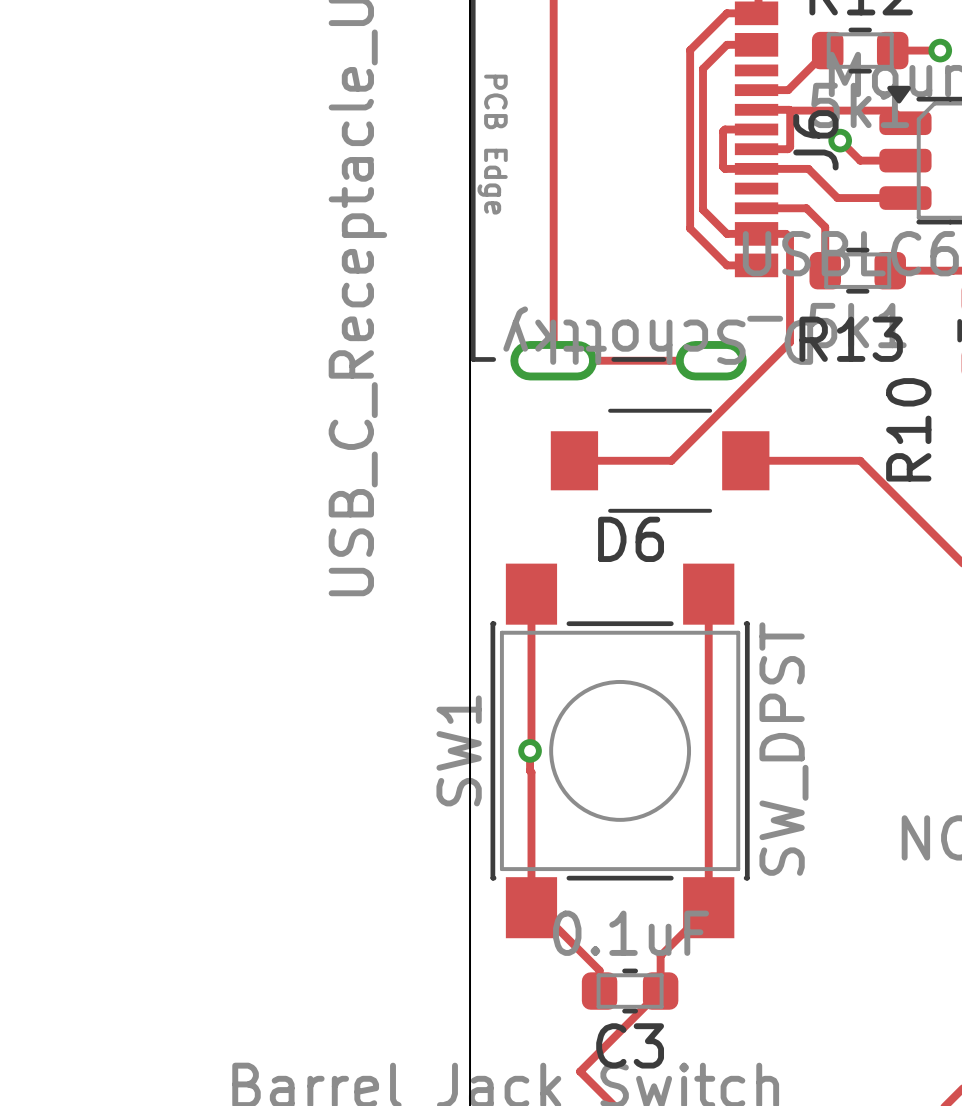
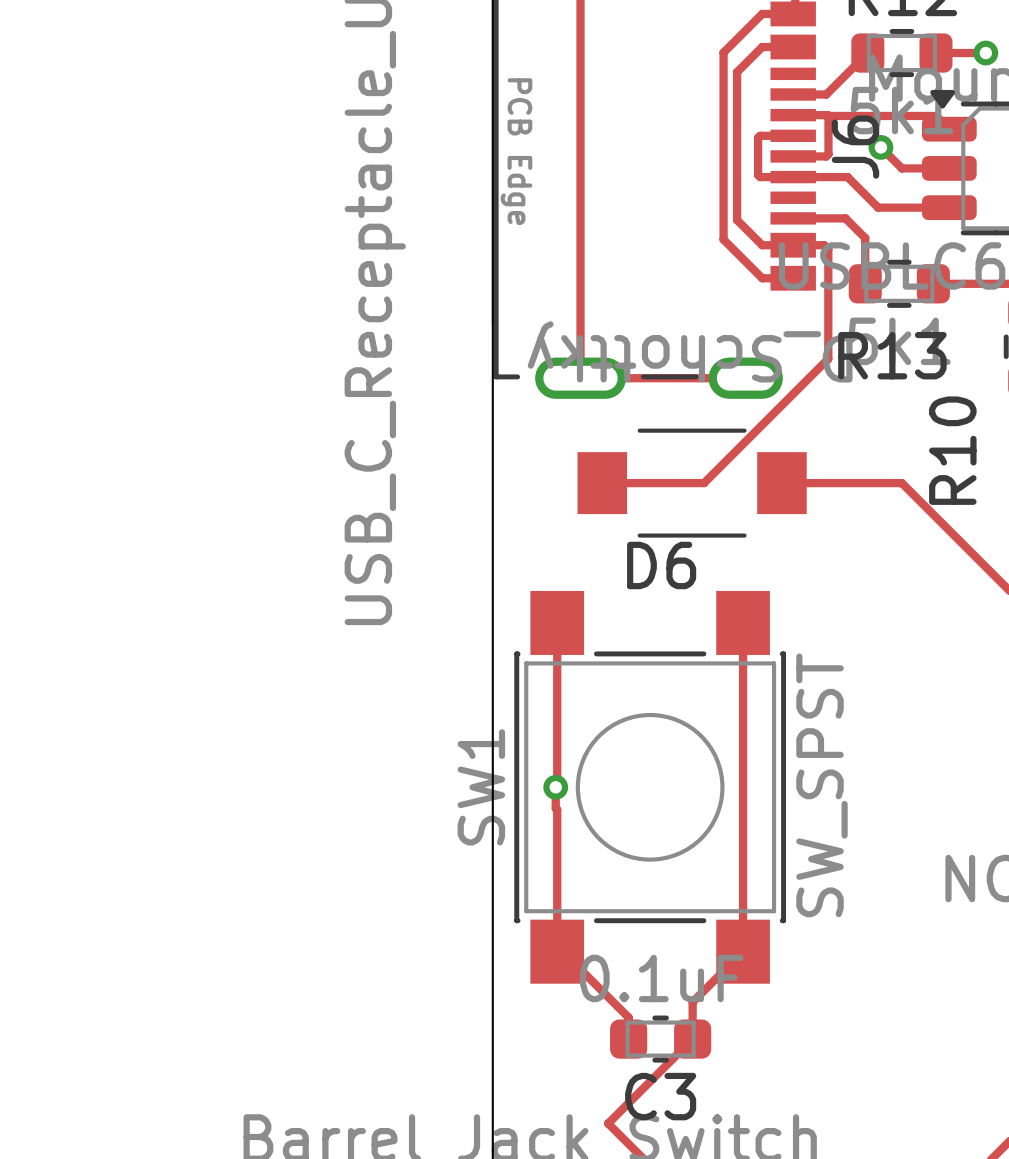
SW1 value: SW_DPST (783, 749) -> SW_SPST (821, 785)

